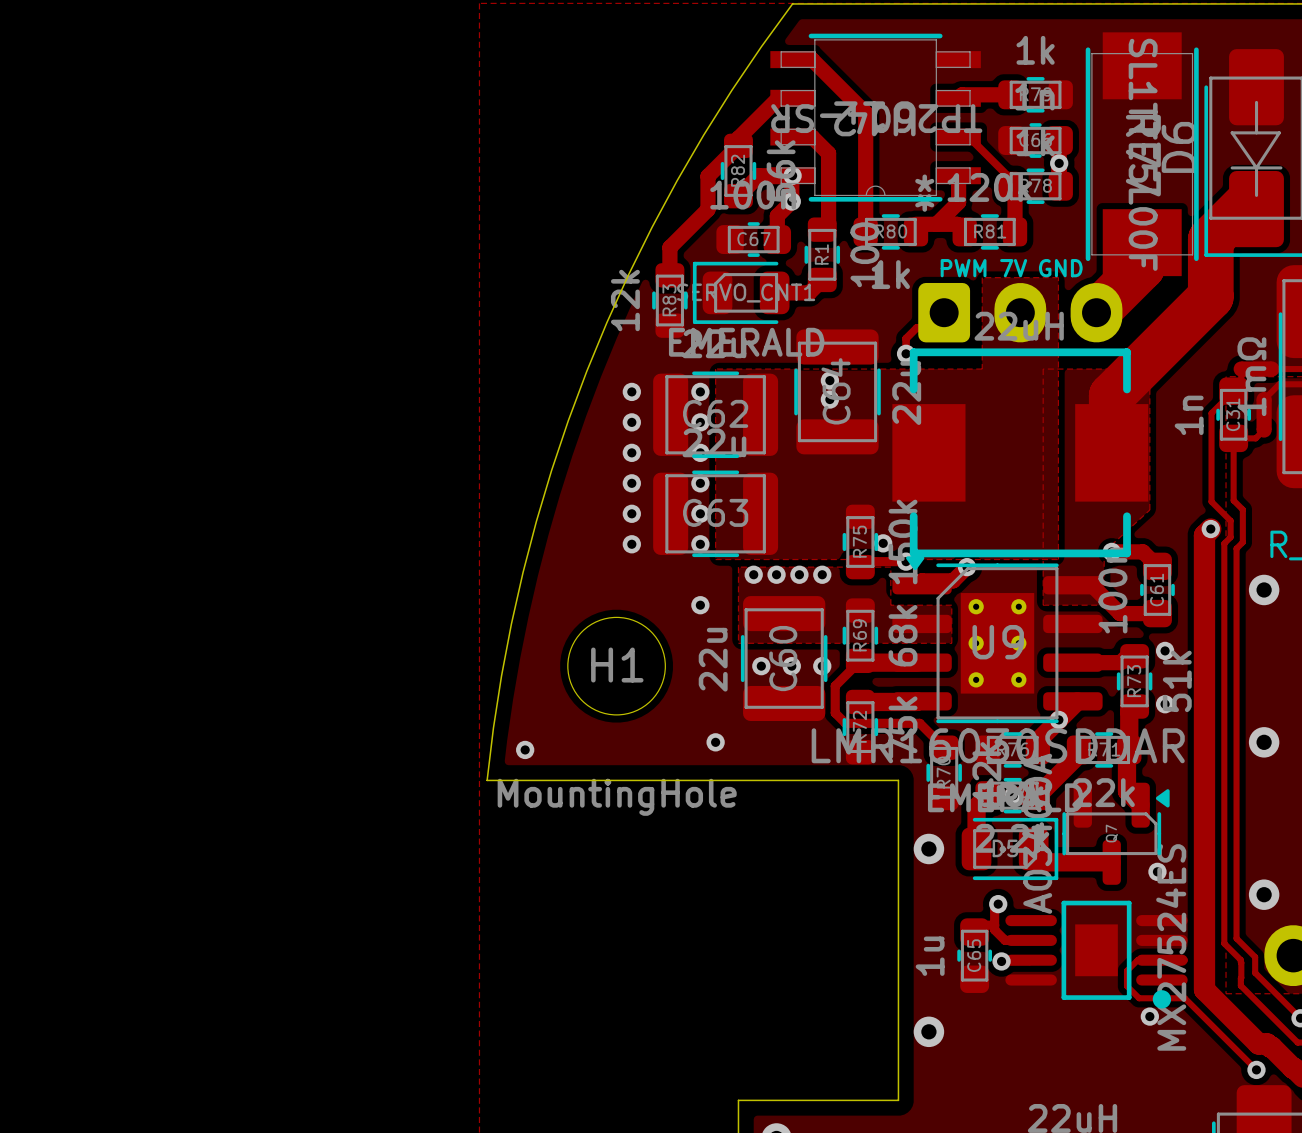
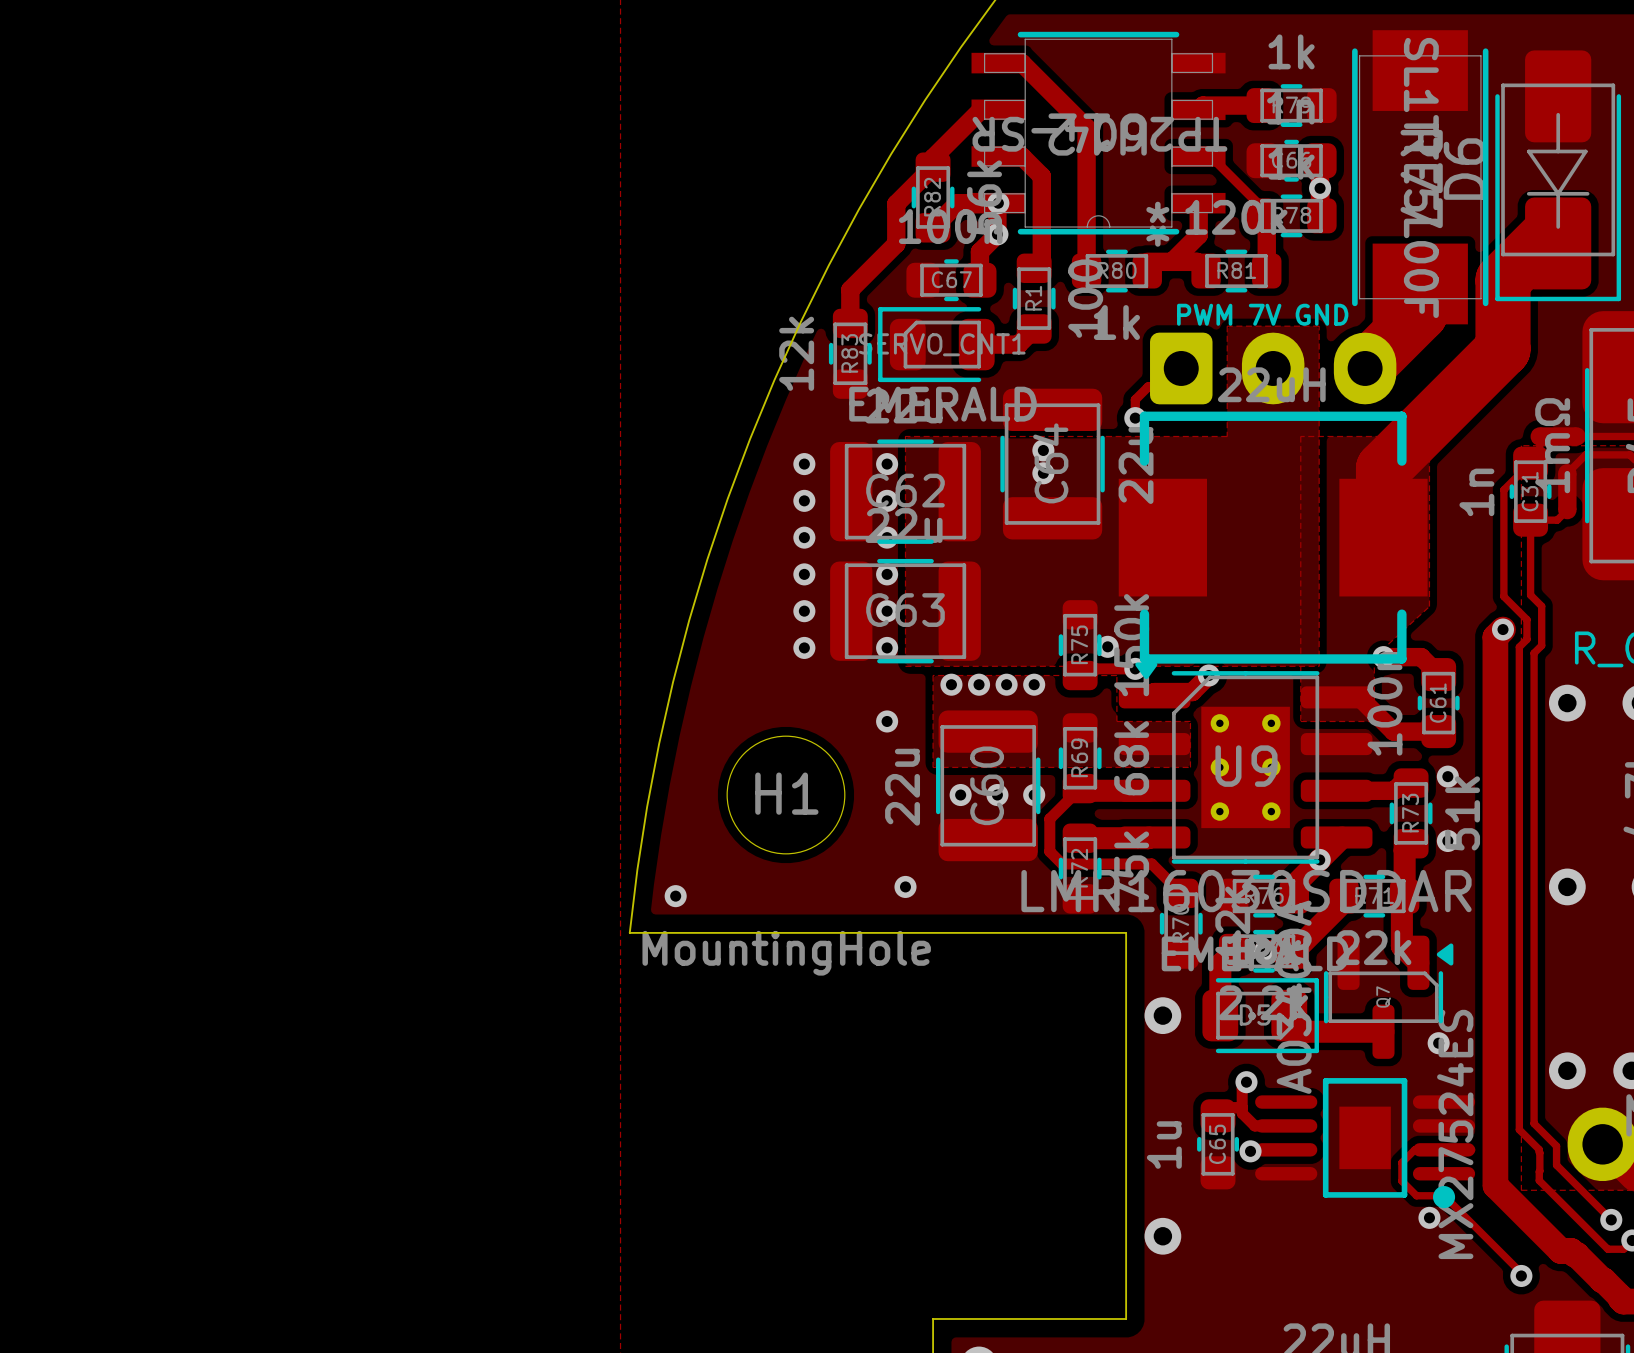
track: (1162, 998) (1184, 998) (1256, 1069) -> (1444, 1195) (1521, 1273) (1521, 1275)
via position: (1256, 1069) -> (1521, 1275)

